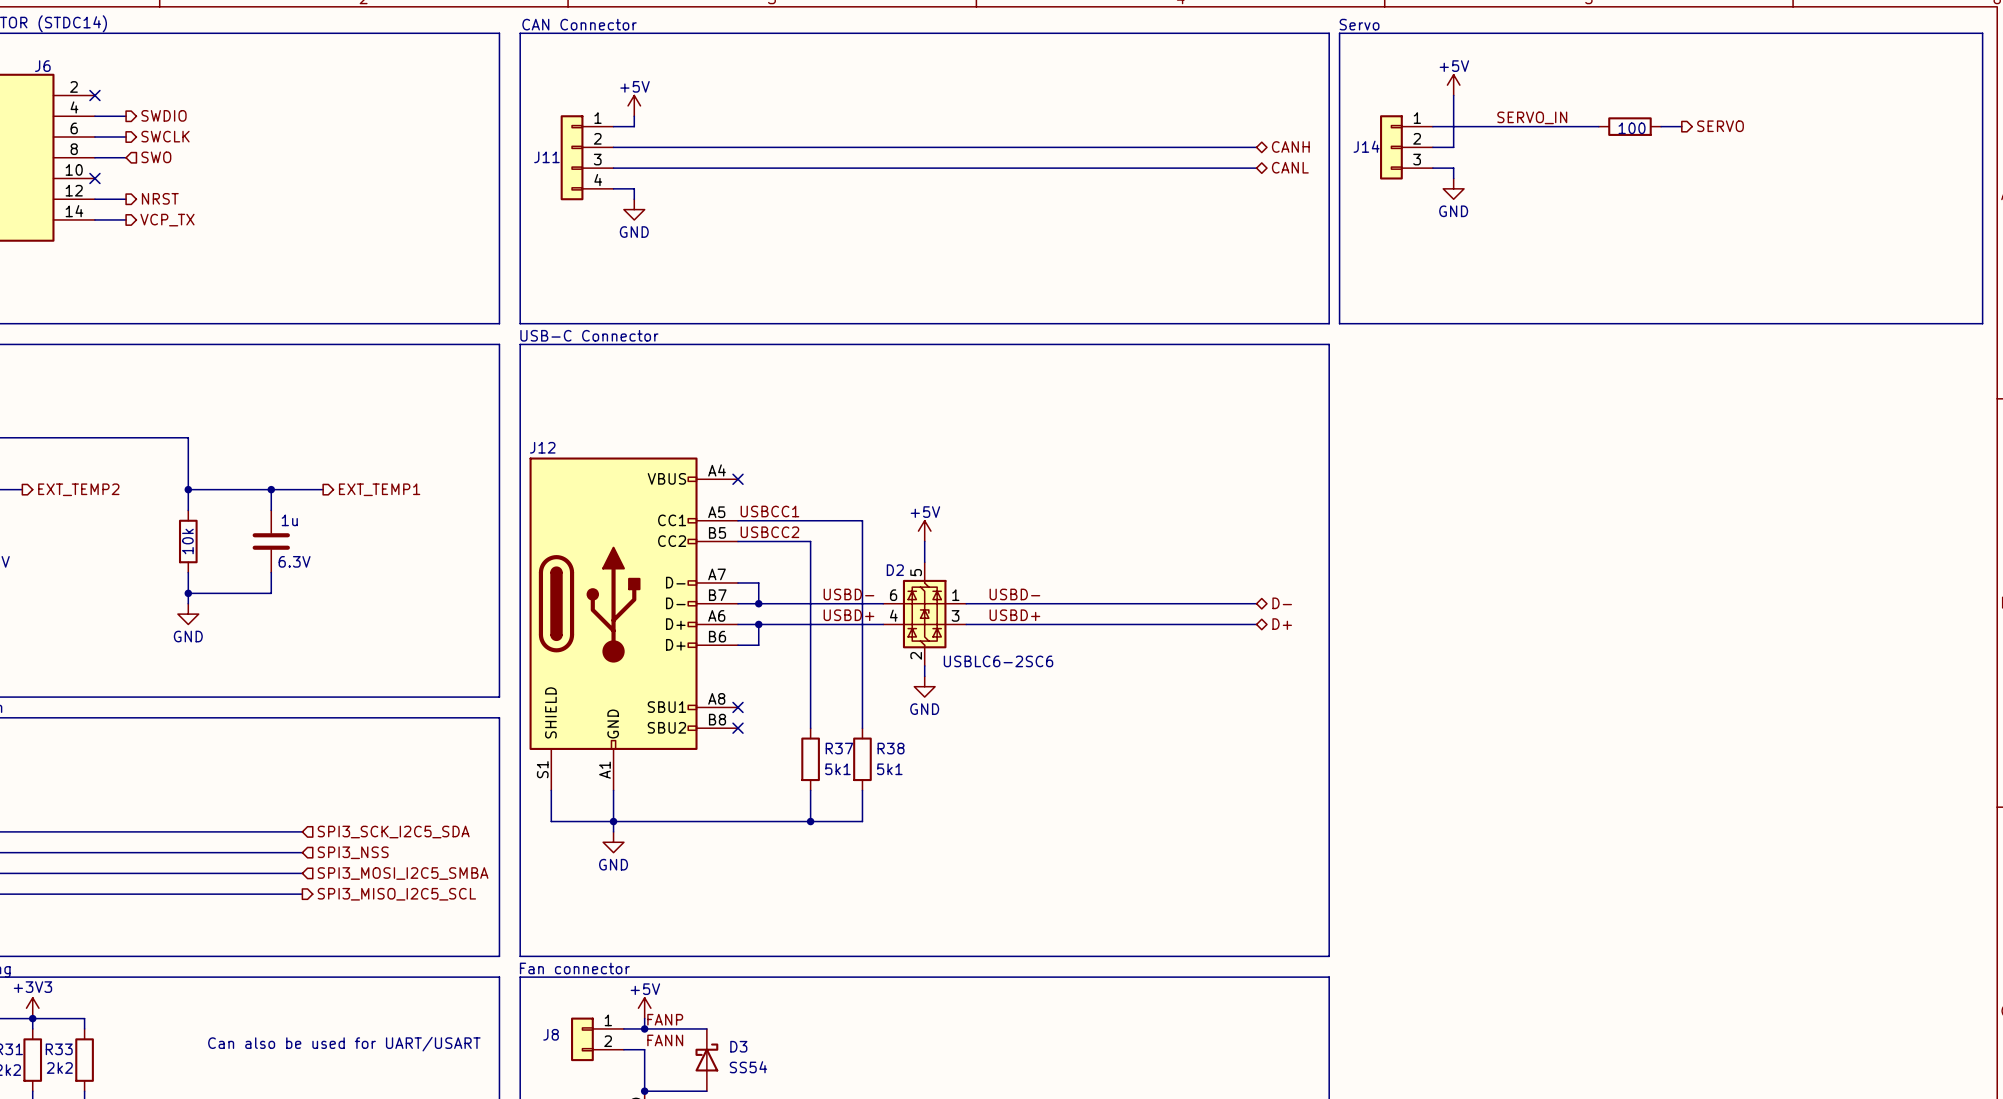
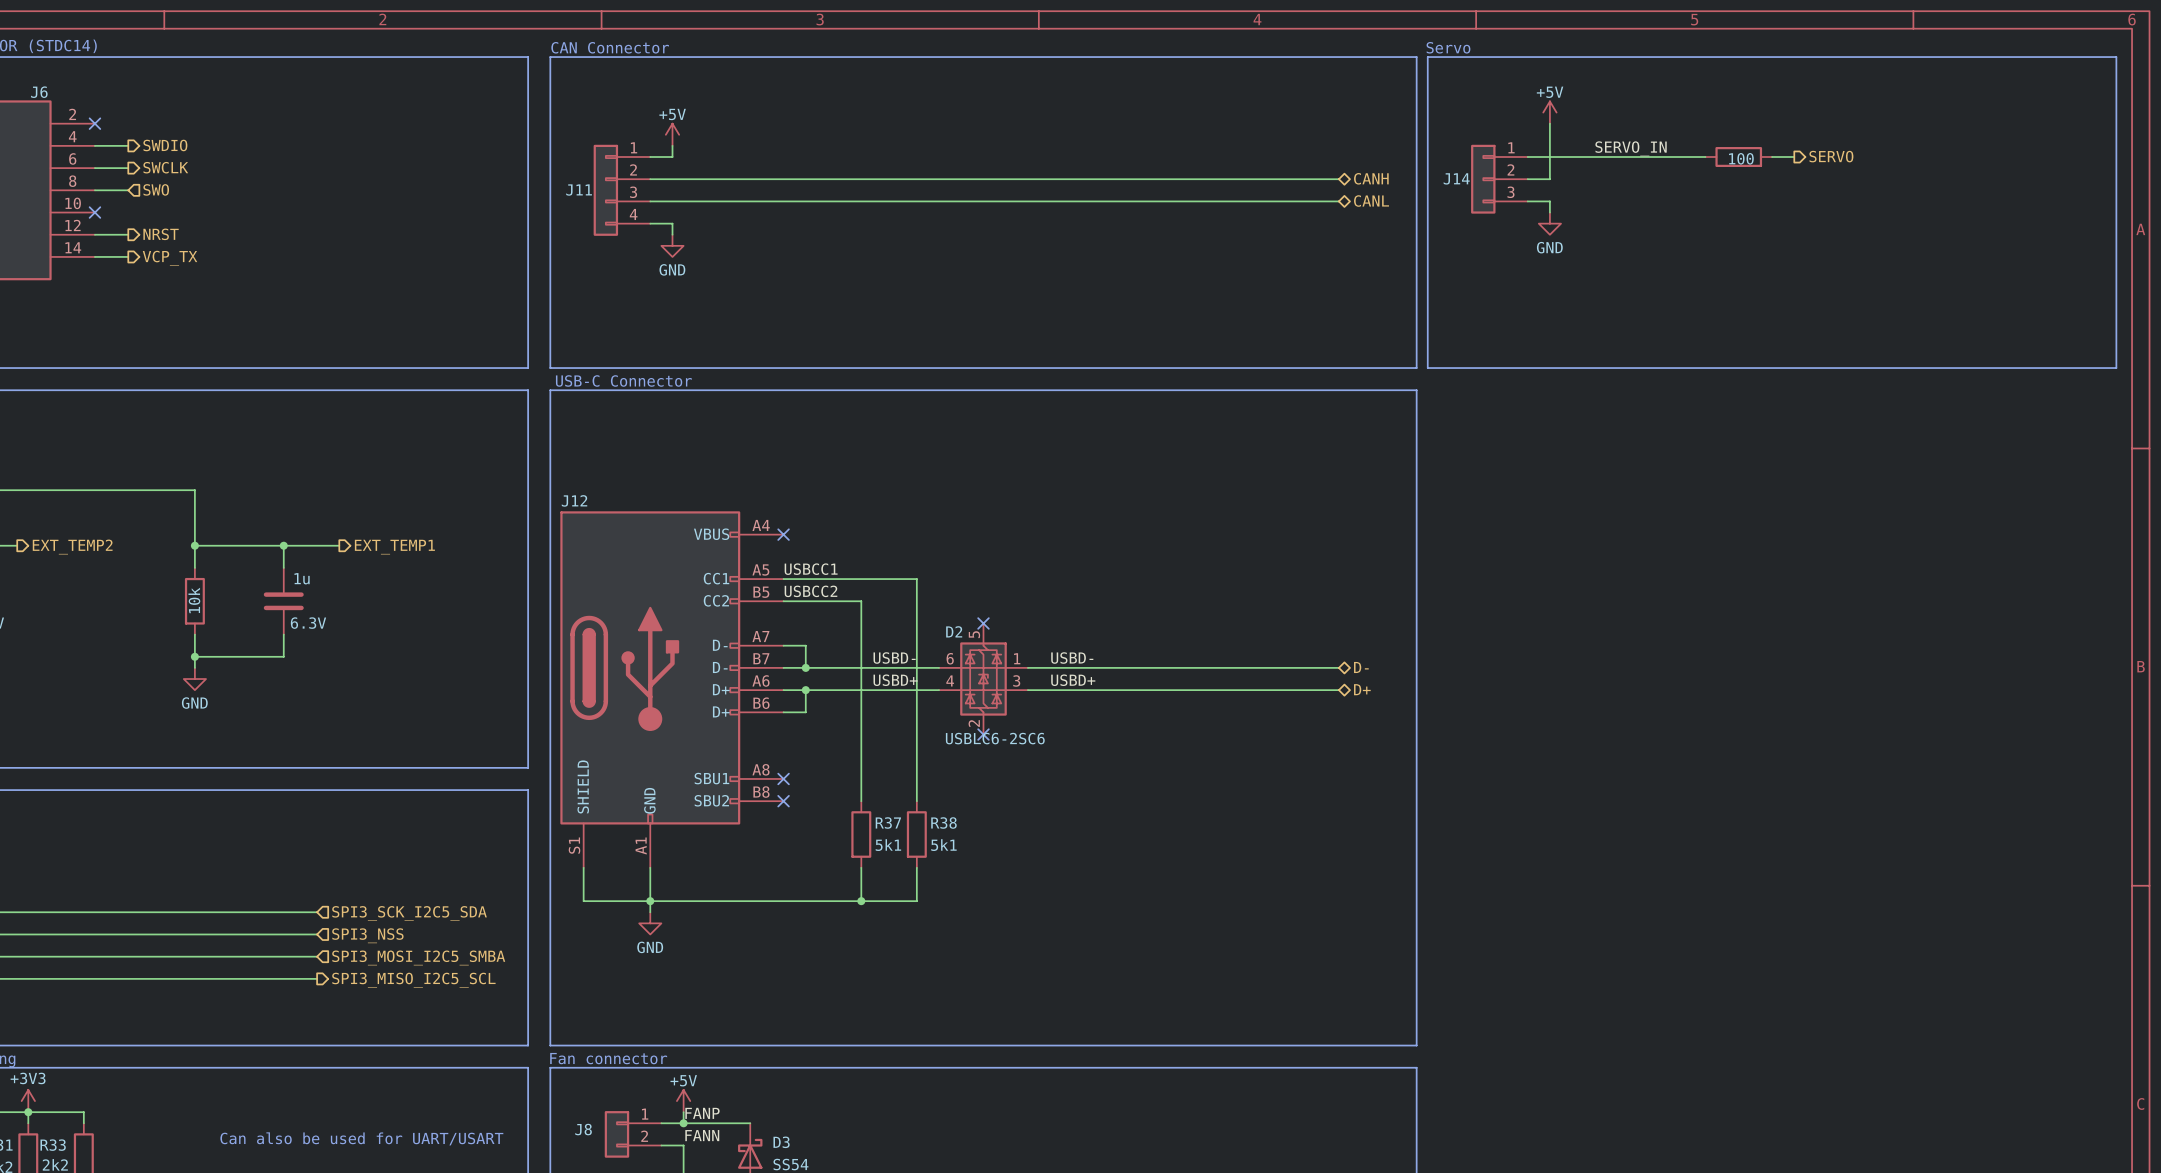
power symbol: +5V (924, 531) -> none
wire: (924, 541) (924, 562) -> none
no-connect mark: none -> (983, 623)
D2 value position: USBLC6-2SC6 (998, 661) -> USBLC6-2SC6 (995, 738)
wire: (924, 665) (924, 676) -> none
no-connect mark: none -> (983, 734)
power symbol: GND (924, 686) -> none

